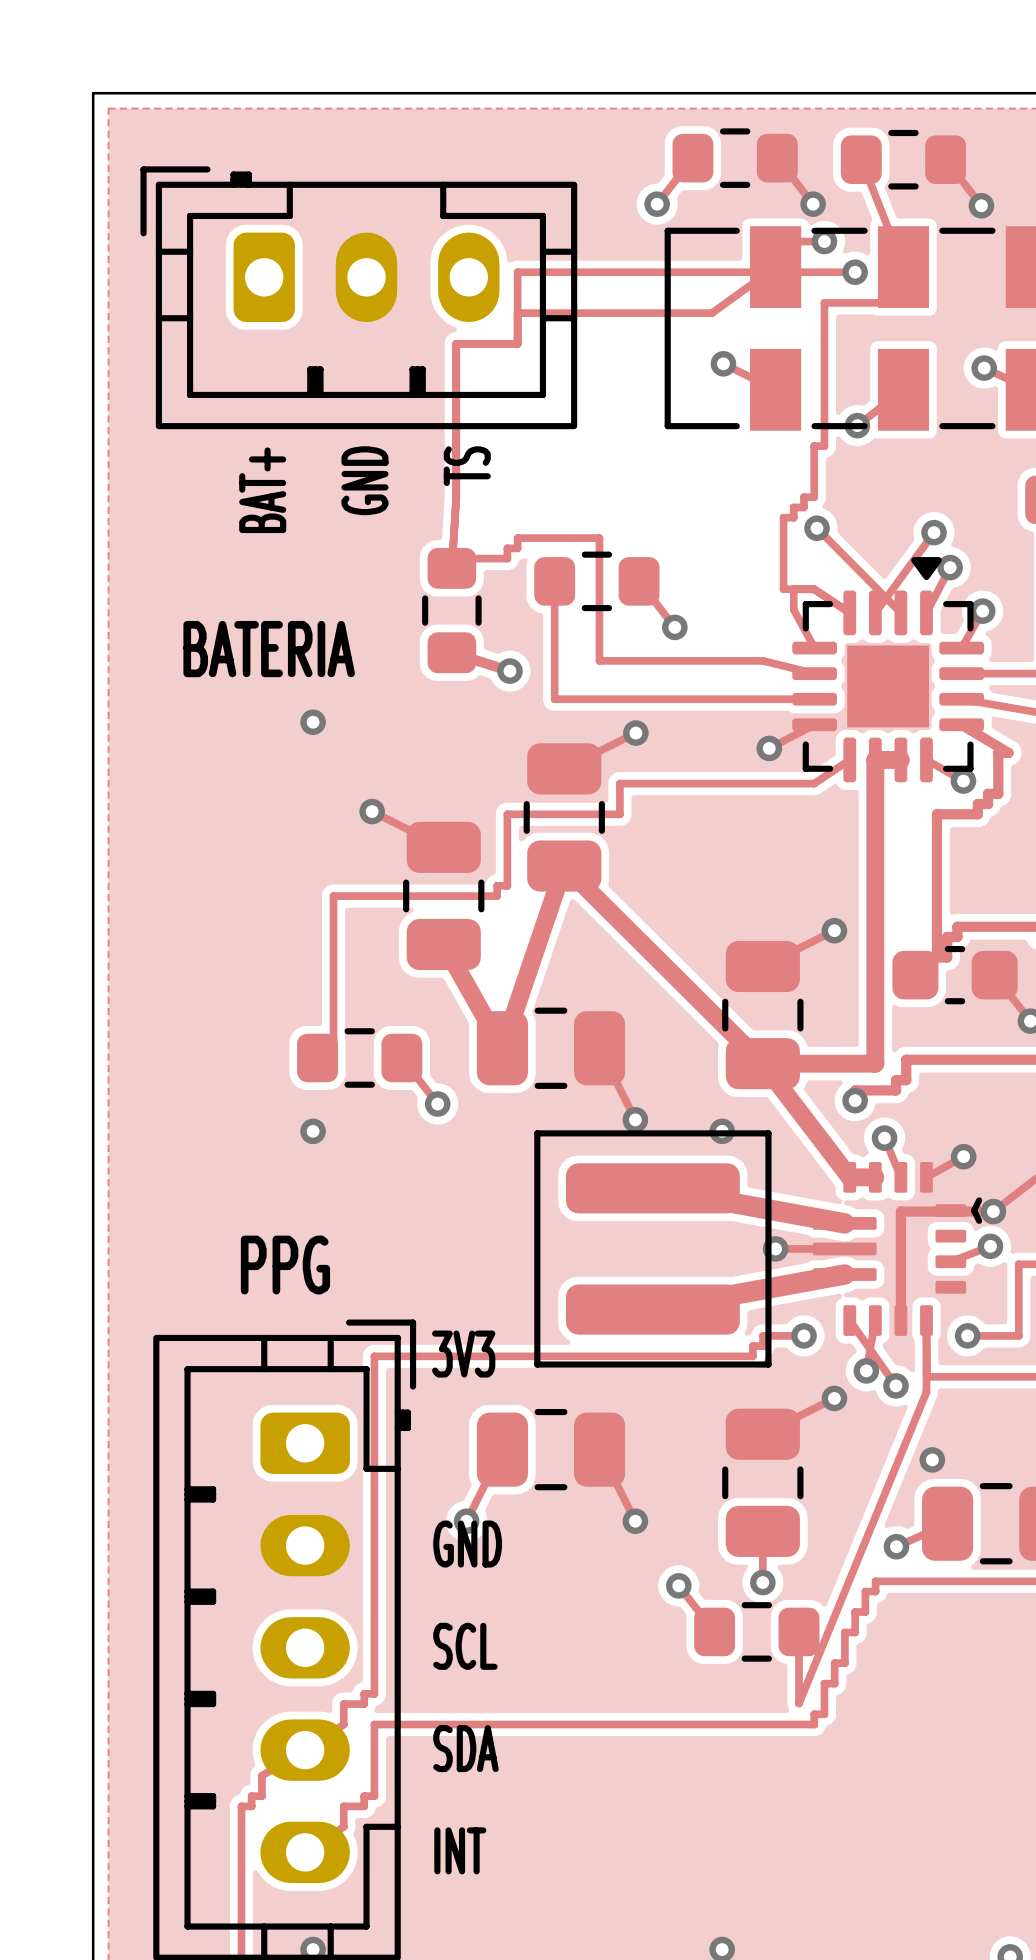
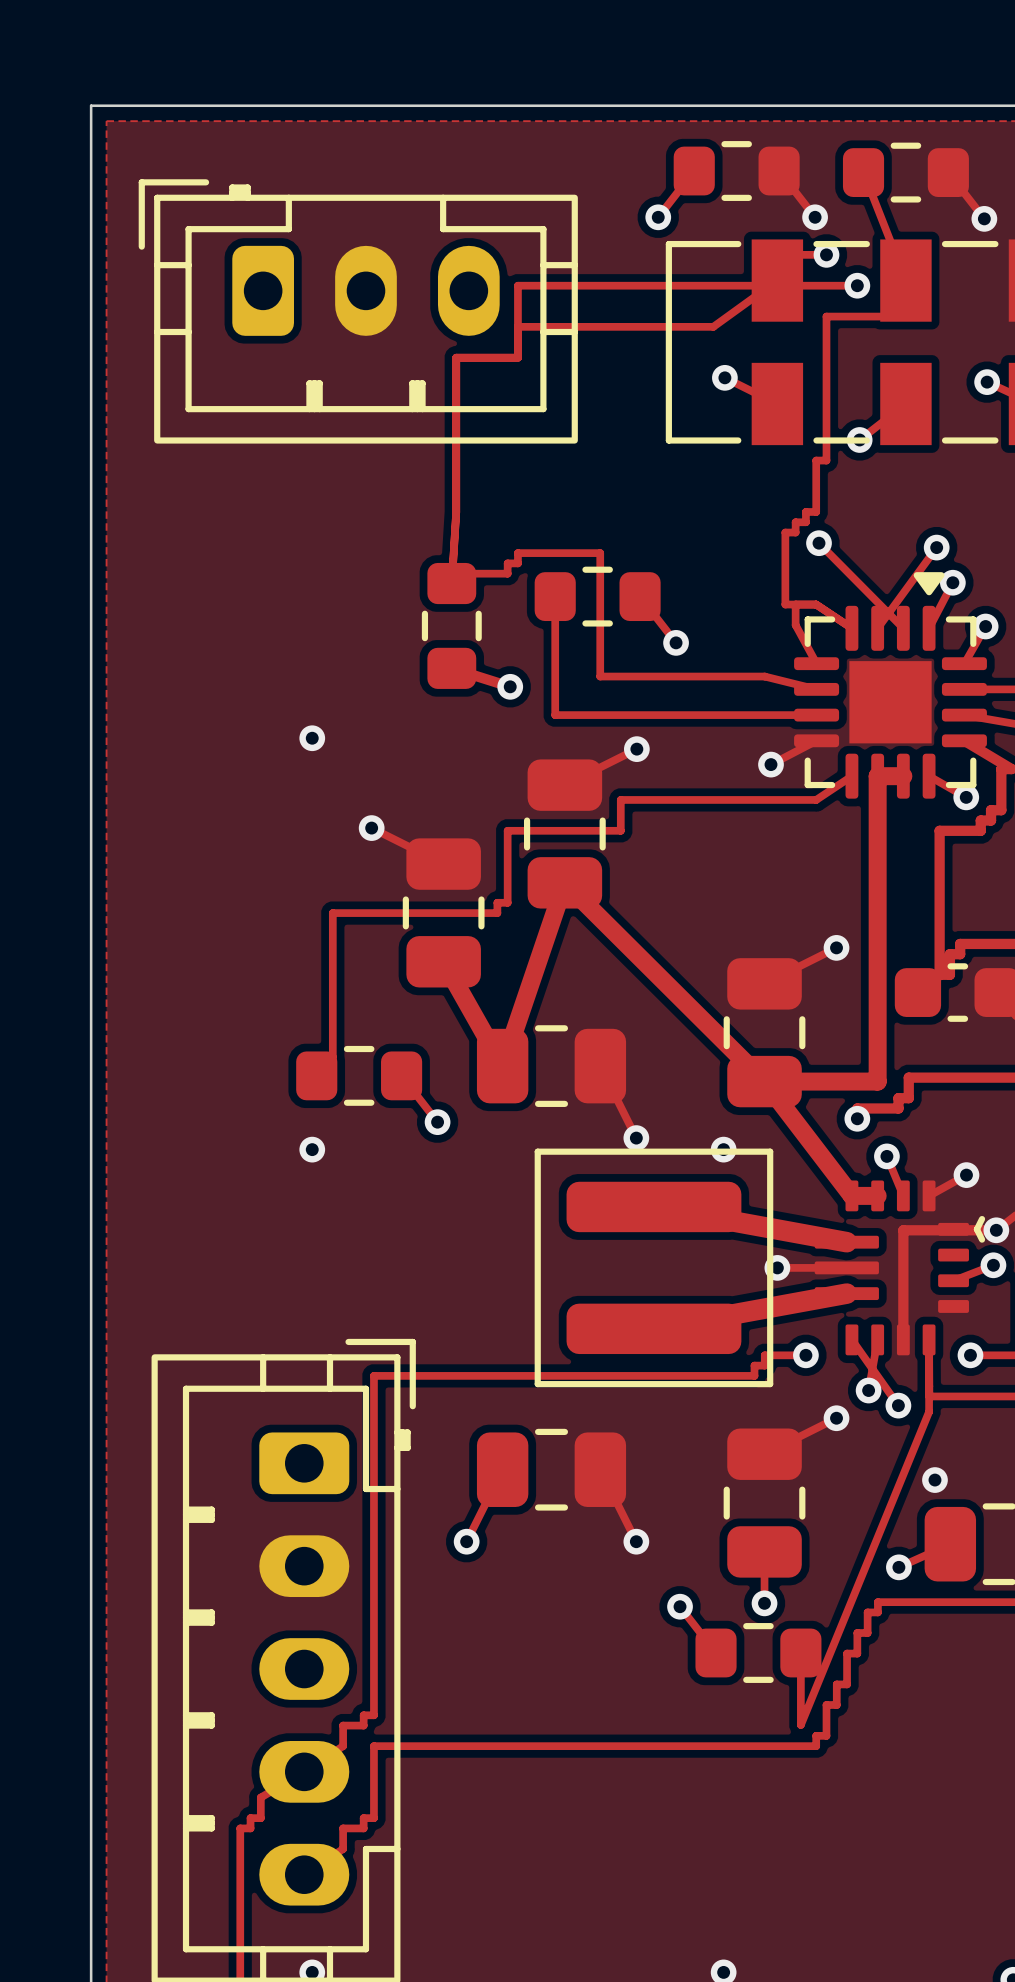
text: TS (467, 466) -> none
text: GND (364, 480) -> none
text: BAT+ (262, 490) -> none
text: BATERIA (269, 649) -> none
text: PPG (285, 1265) -> none
text: 3V3 (463, 1354) -> none
text: GND (467, 1544) -> none
text: SCL (465, 1646) -> none
text: SDA (465, 1748) -> none
text: INT (460, 1850) -> none

